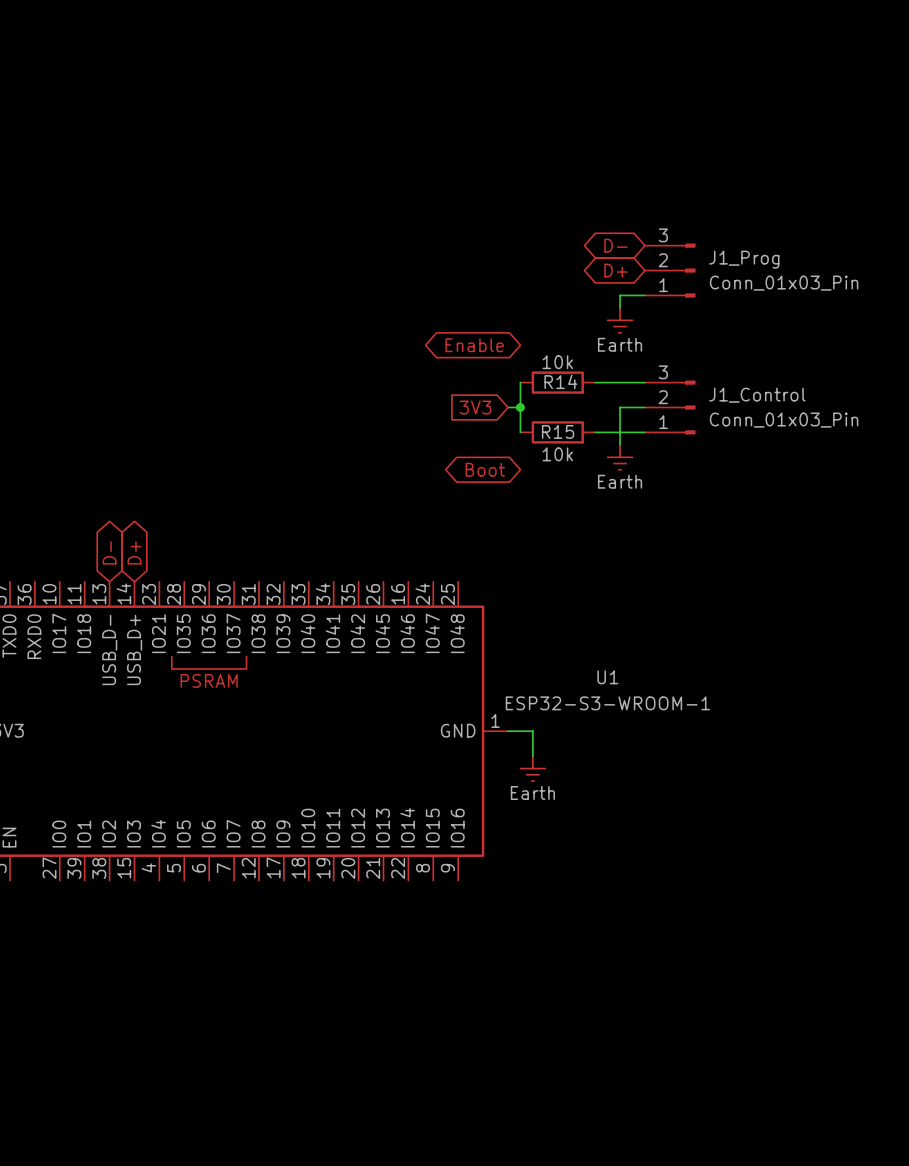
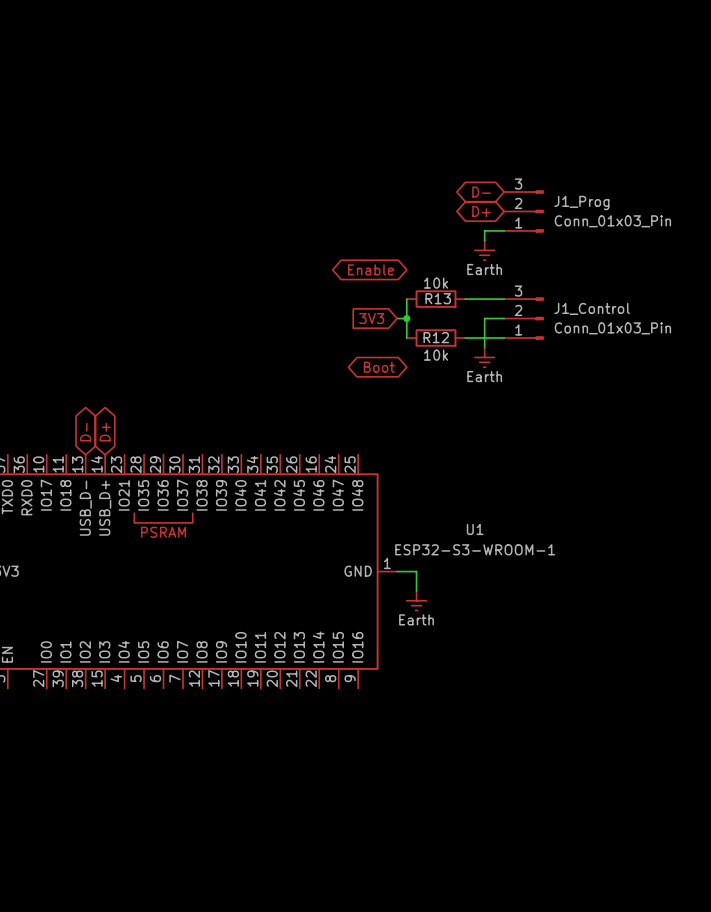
R14 name: R14 (560, 381) -> R13 (438, 298)
R15 name: R15 (558, 431) -> R12 (436, 337)

